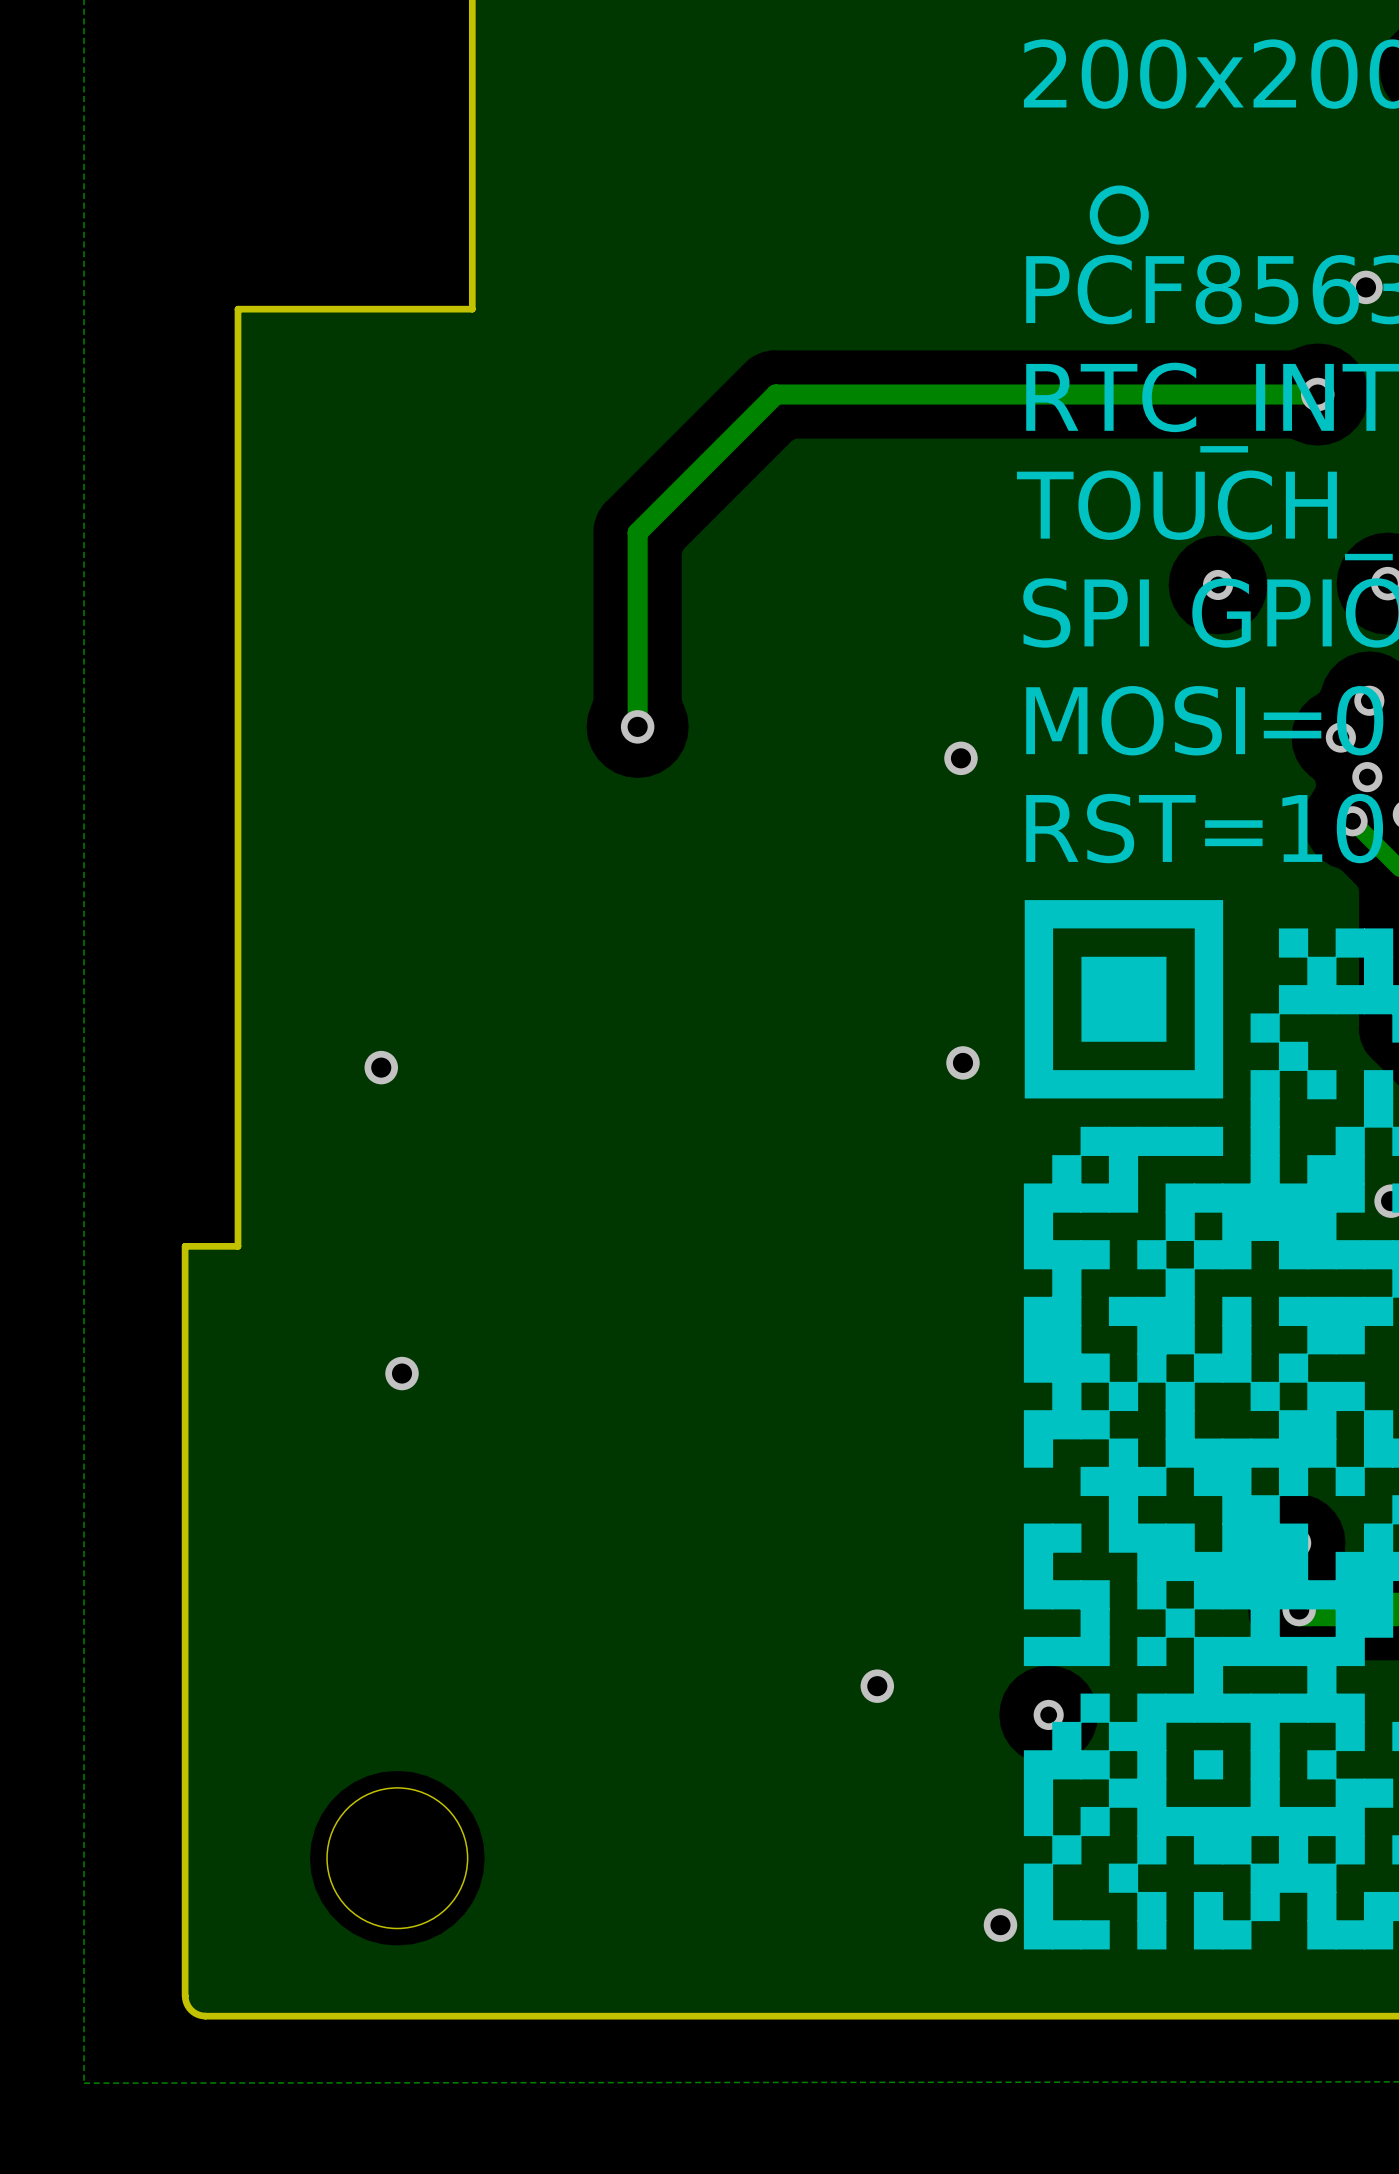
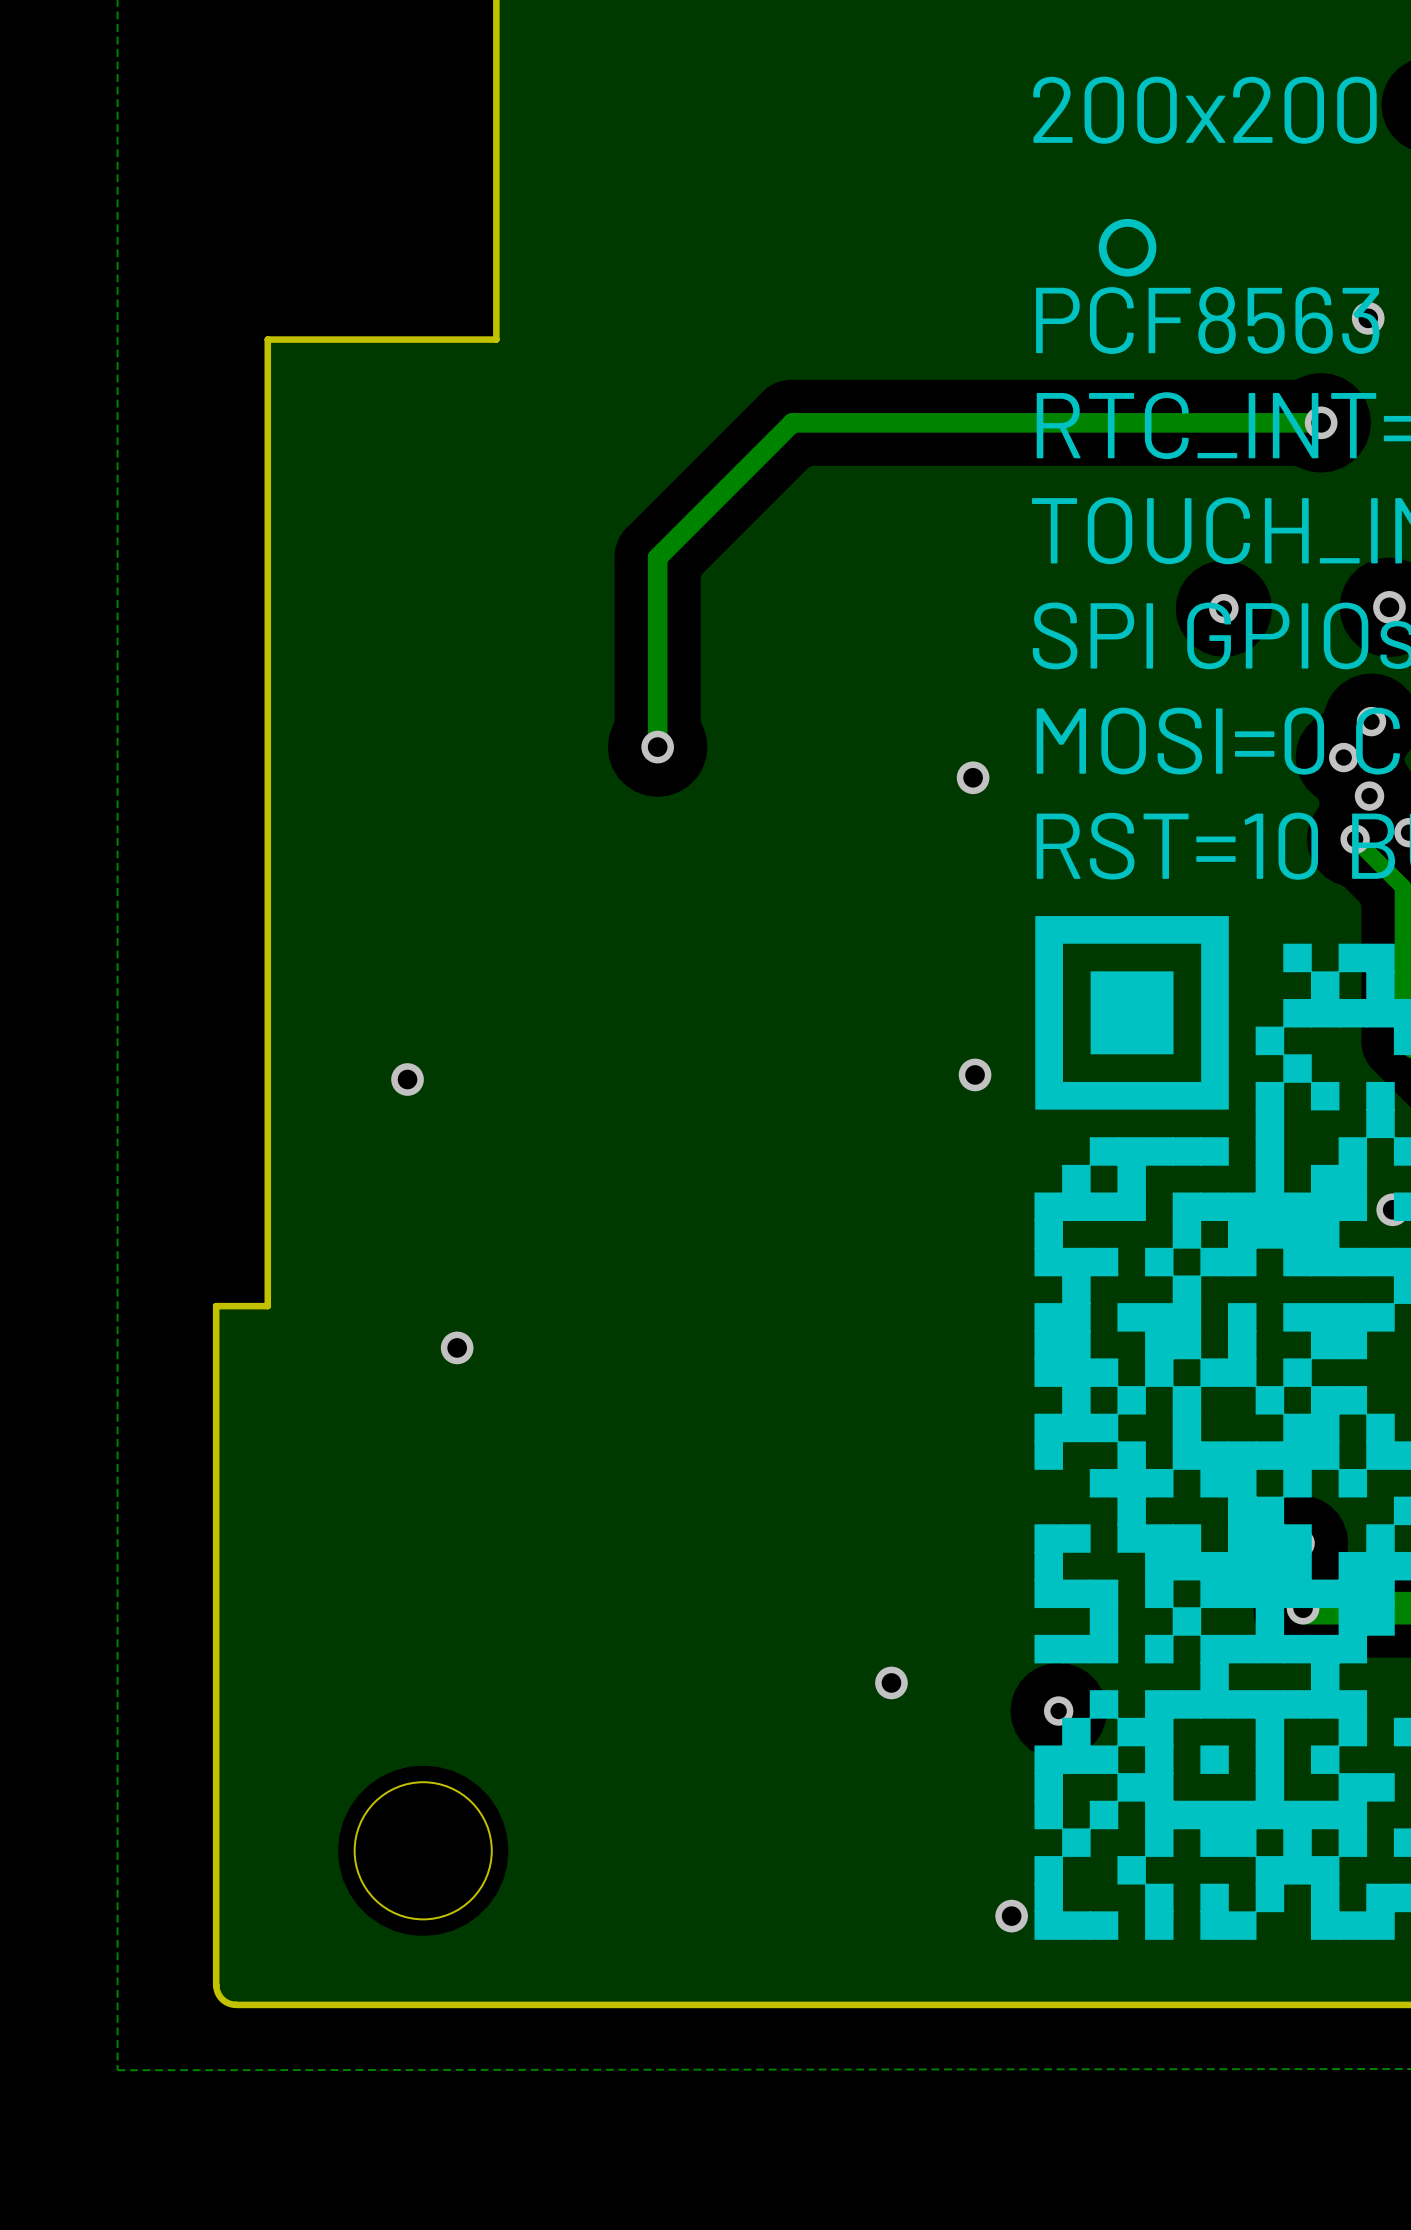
board edge: (238, 1246) (185, 1246) (185, 1299) -> (267, 1253) (267, 1306) (216, 1306)
via position: (402, 1373) -> (457, 1347)

